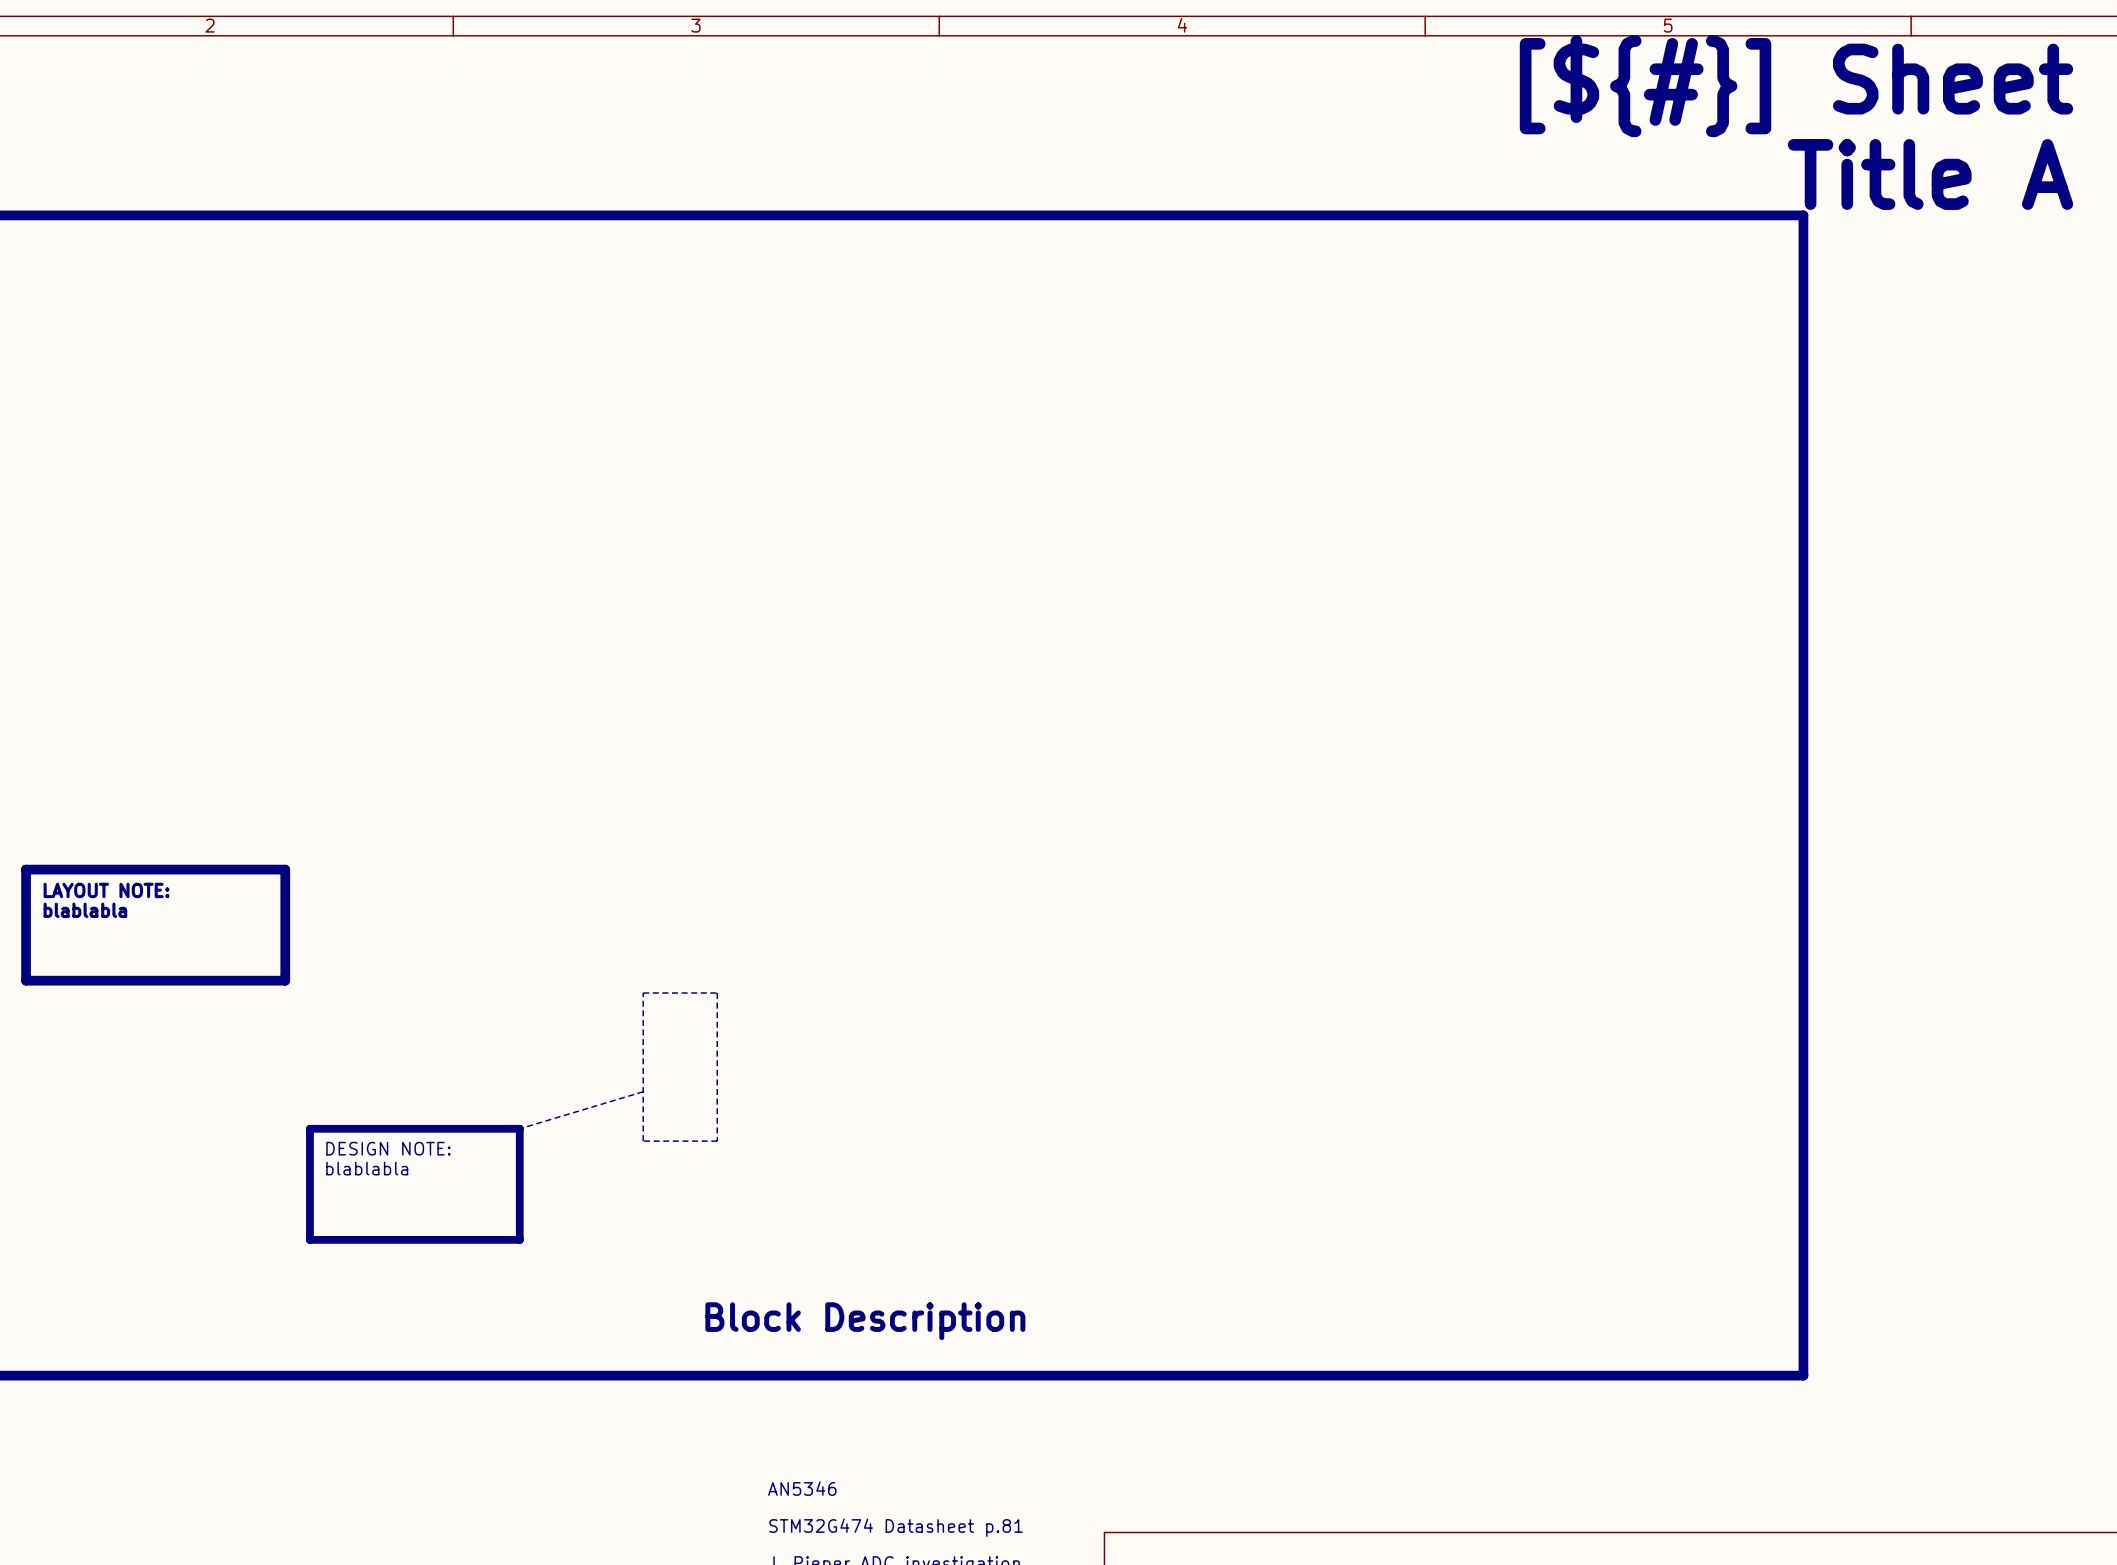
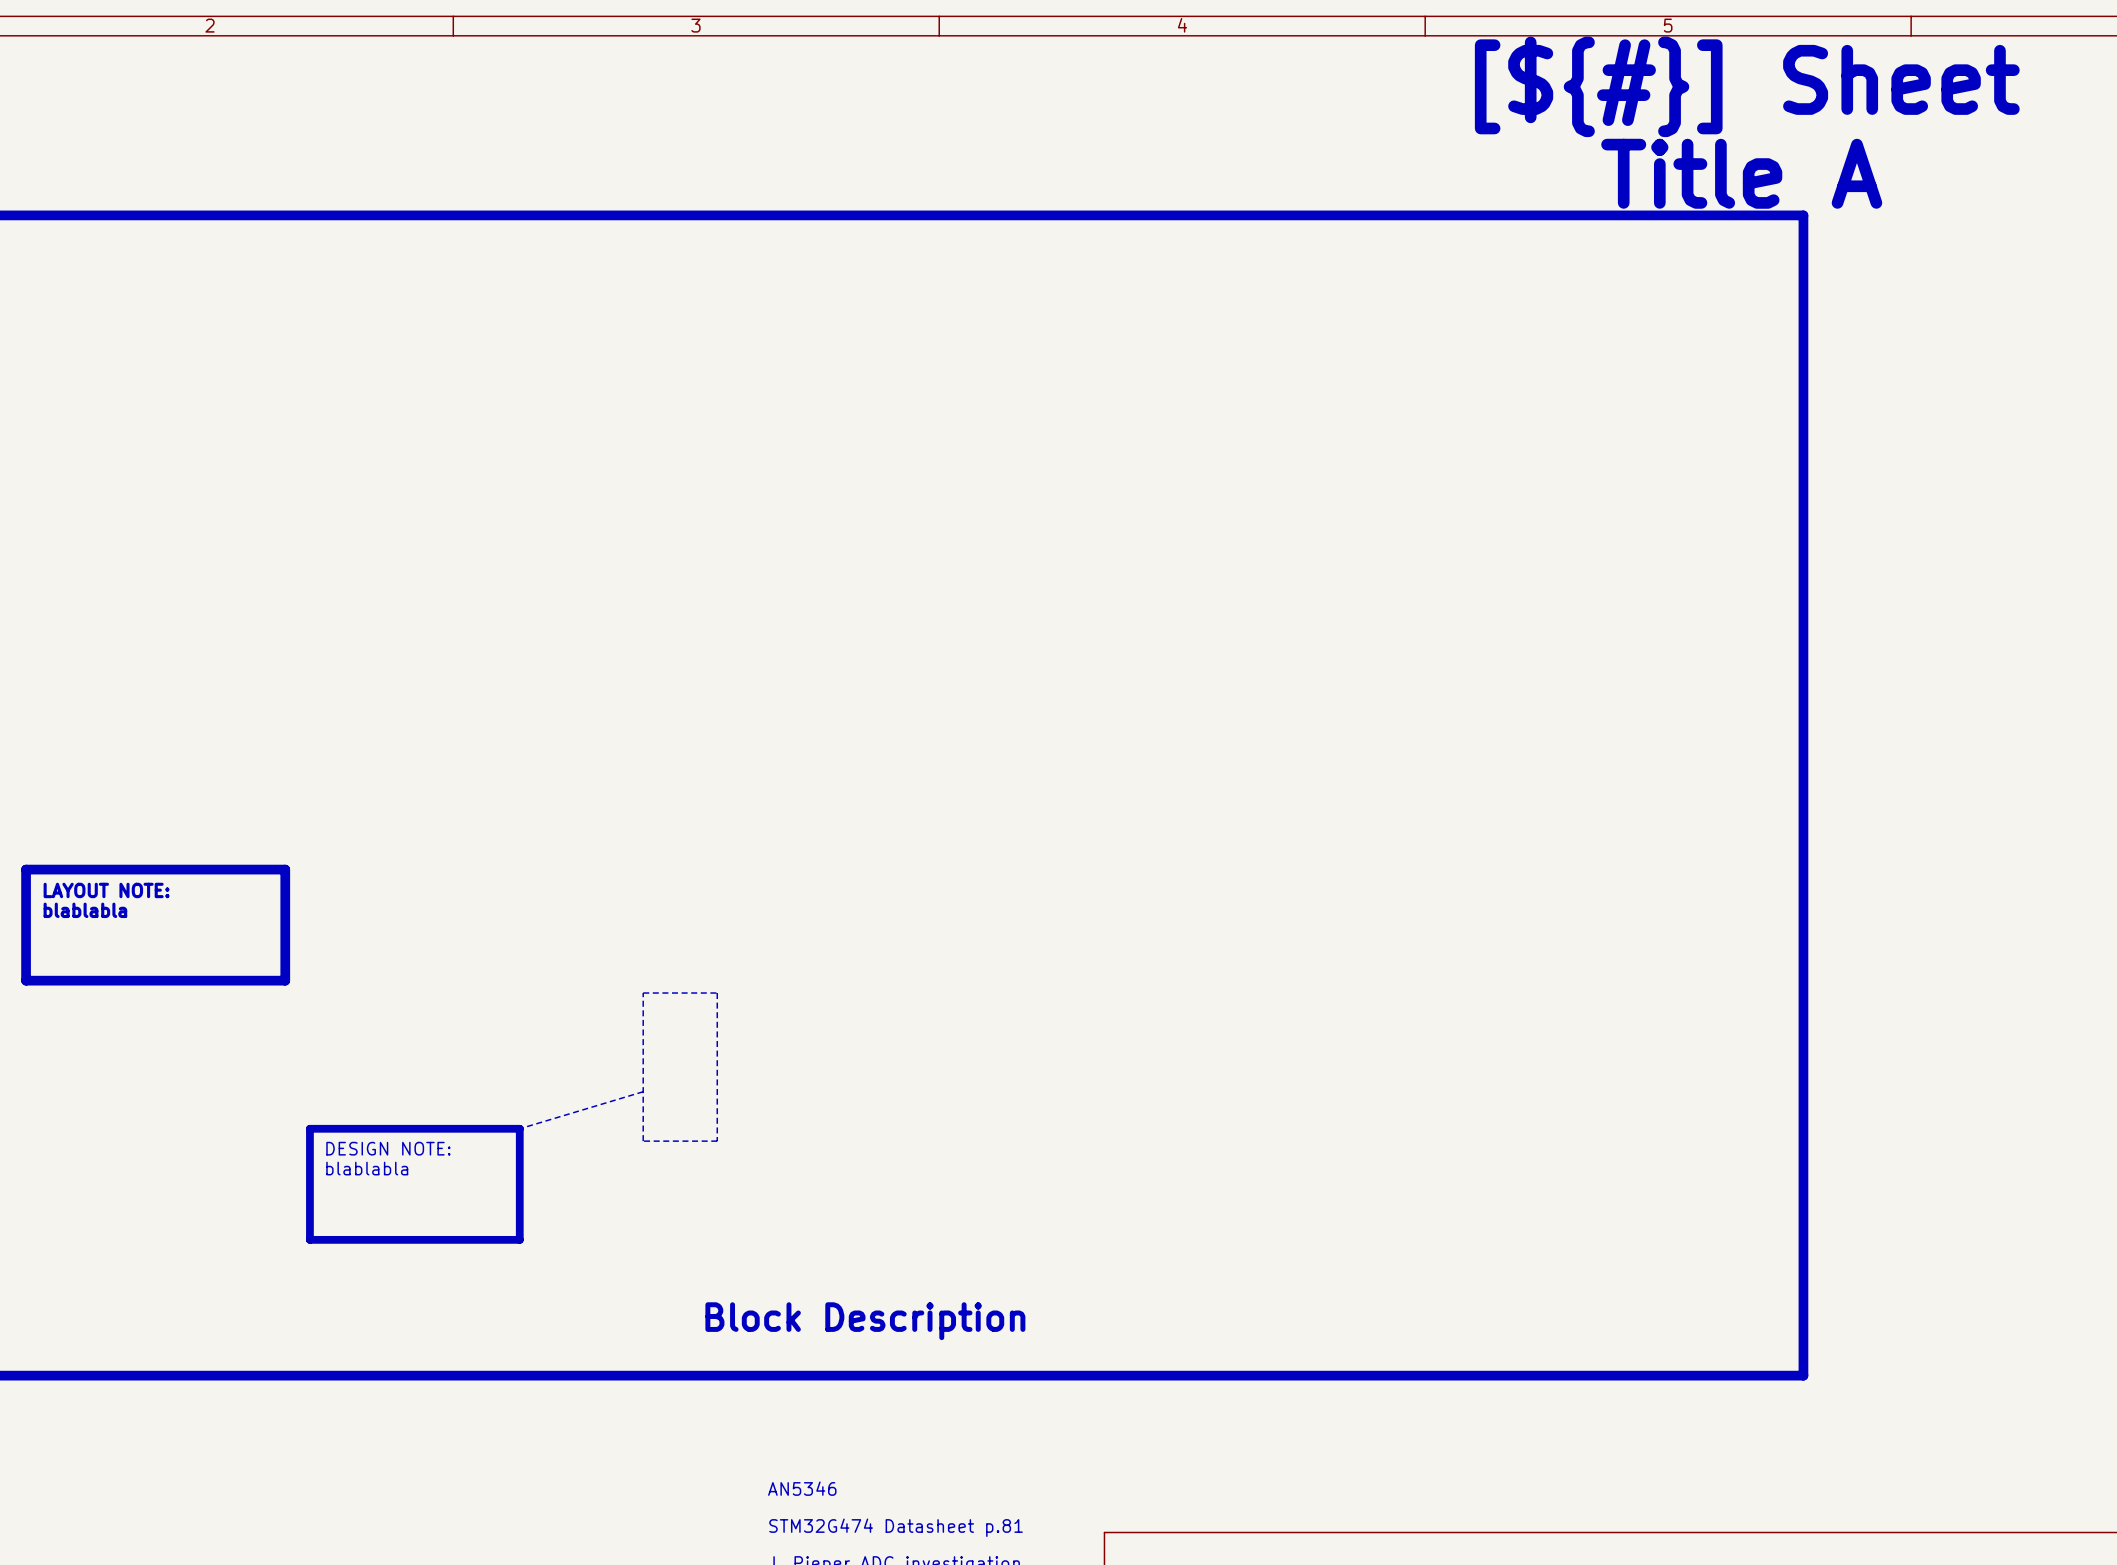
text: none -> [${#}] Sheet (1747, 86)
text: [${#}] Sheet (1796, 86) -> none
text: none -> Title A (1741, 173)
text: Title A (1930, 174) -> none

